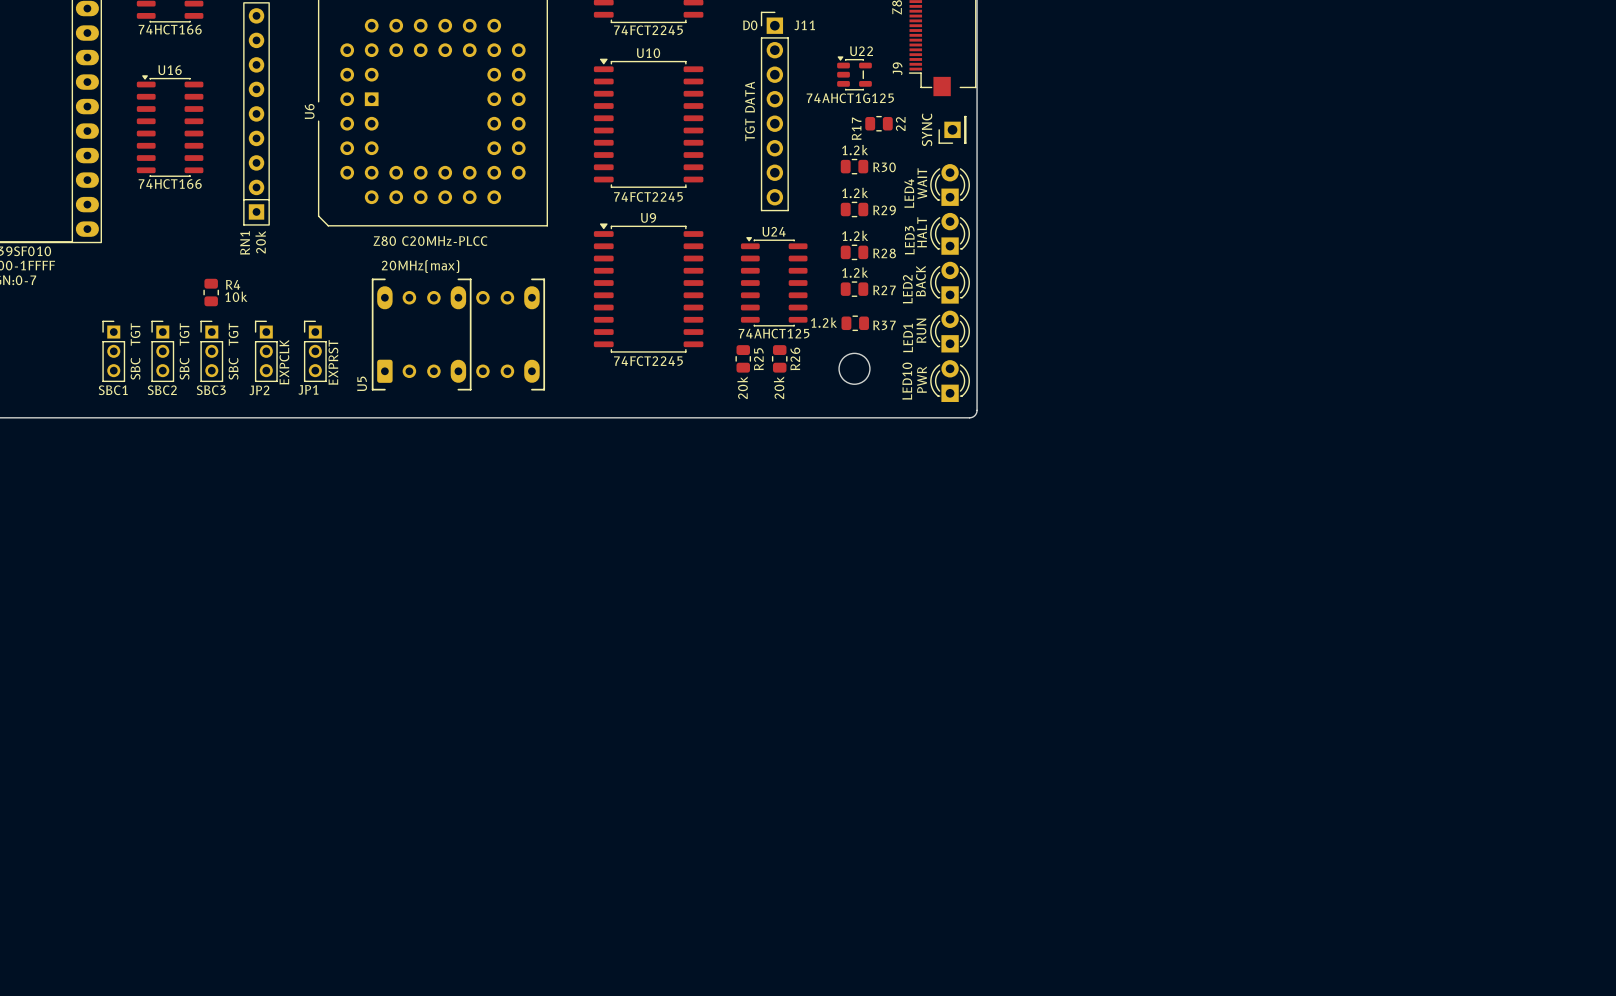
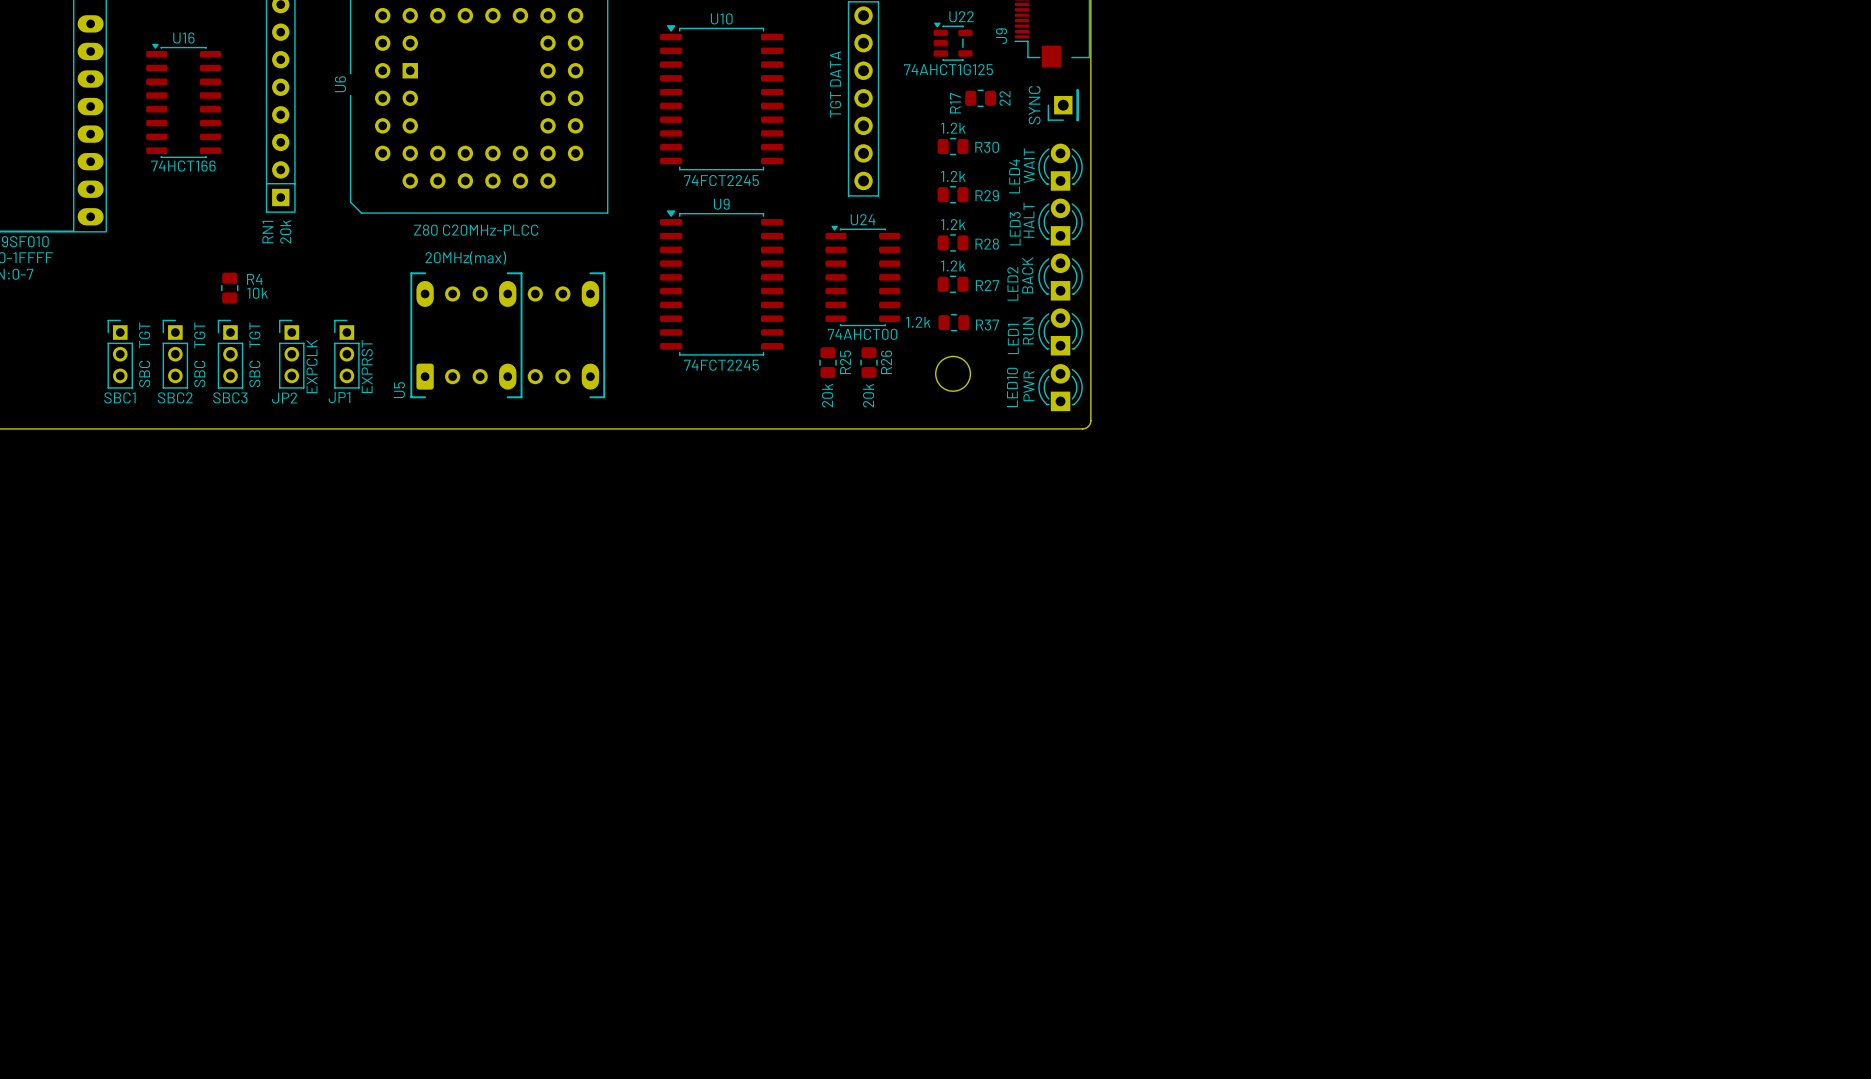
U24 value: 74AHCT125 (774, 333) -> 74AHCT00 (862, 334)

